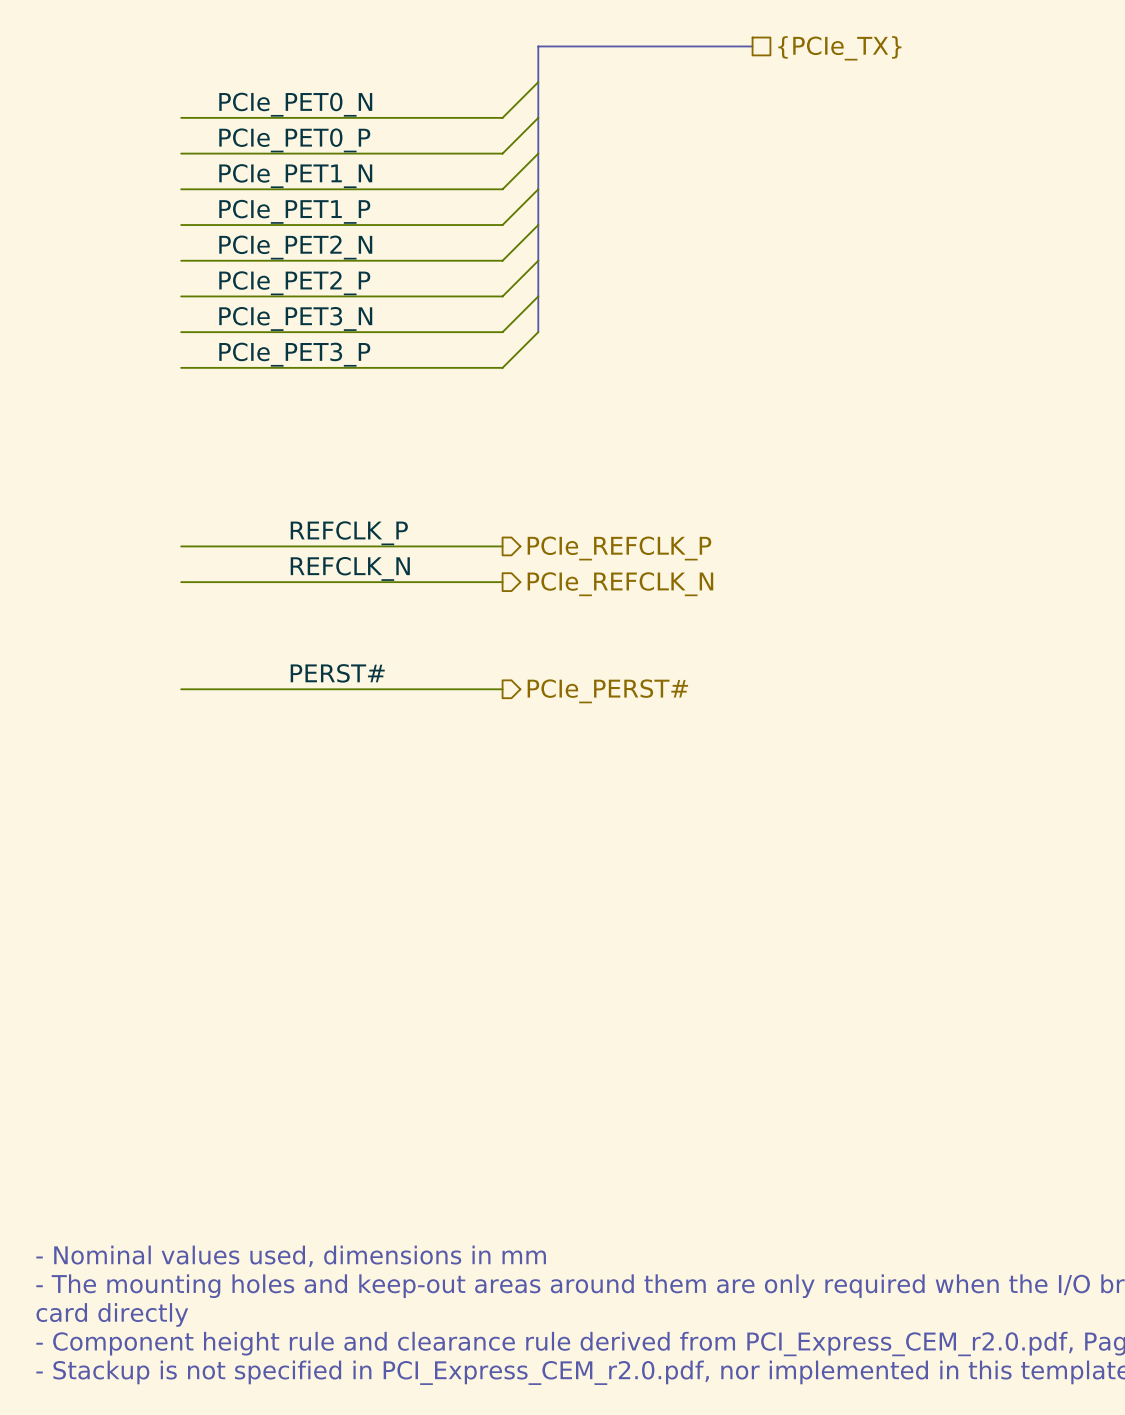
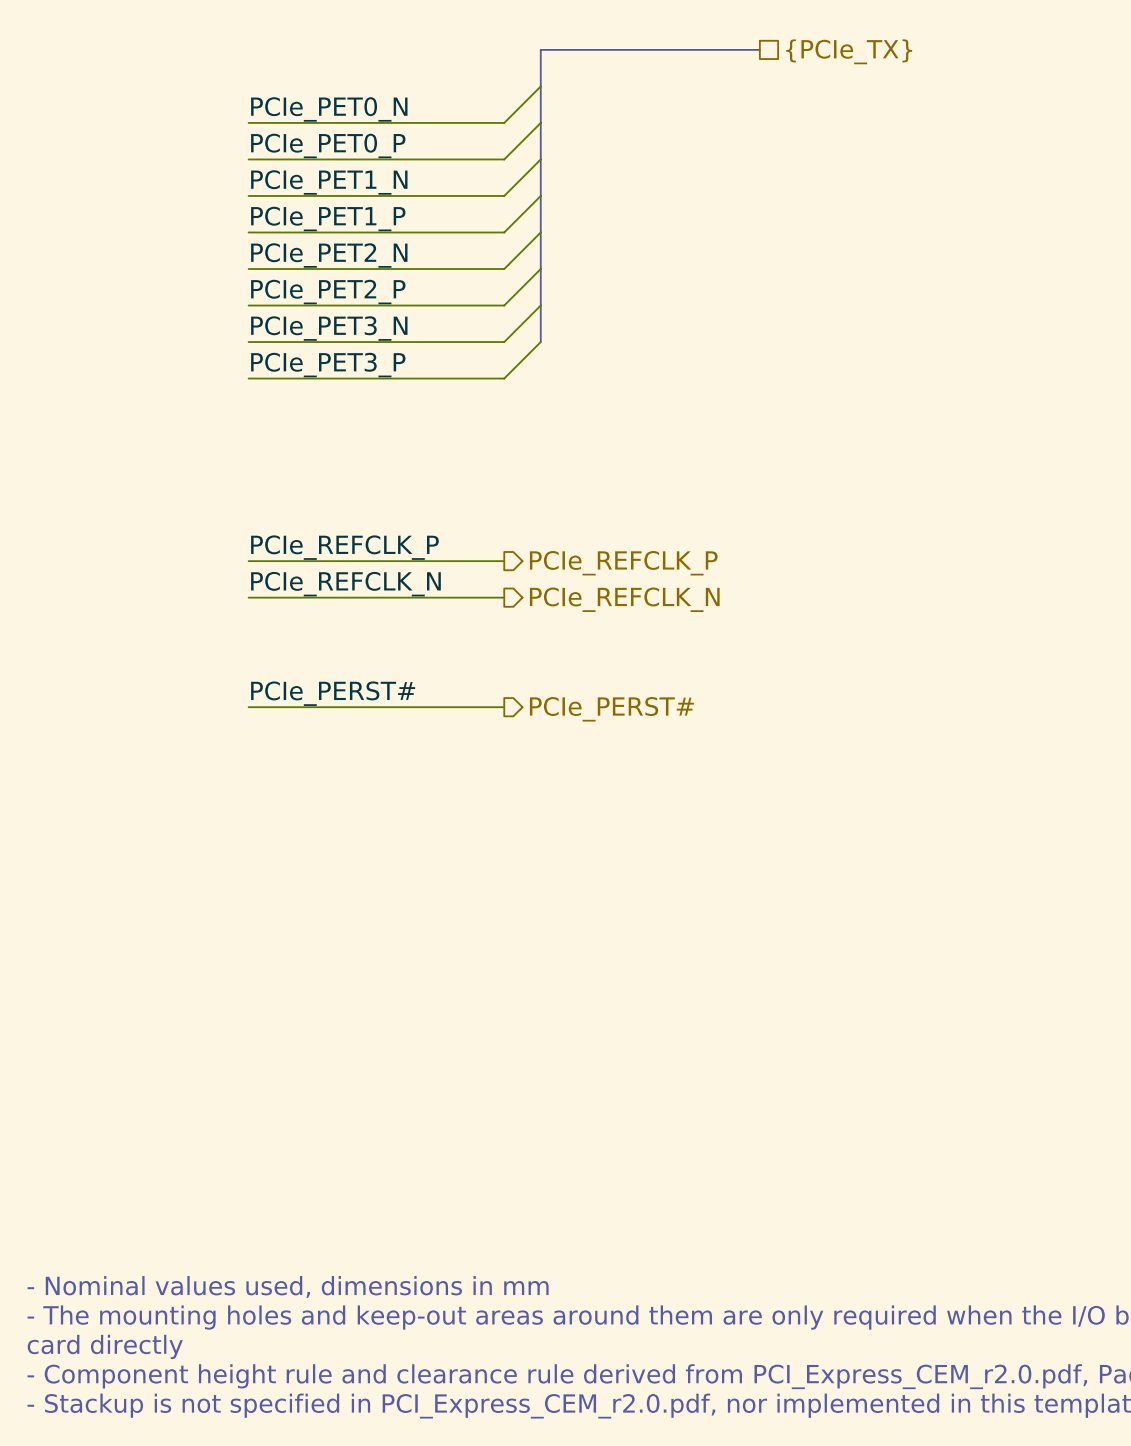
label position: PCIe_PET0_N (295, 104) -> PCIe_PET0_N (329, 109)
wire: (181, 117) (252, 117) -> none
label position: PCIe_PET0_P (294, 140) -> PCIe_PET0_P (328, 145)
wire: (181, 153) (252, 153) -> none
label position: PCIe_PET1_N (295, 176) -> PCIe_PET1_N (329, 182)
wire: (181, 189) (252, 189) -> none
label position: PCIe_PET1_P (294, 211) -> PCIe_PET1_P (328, 218)
wire: (181, 225) (252, 225) -> none
label position: PCIe_PET2_N (295, 247) -> PCIe_PET2_N (329, 255)
wire: (181, 260) (252, 260) -> none
label position: PCIe_PET2_P (294, 283) -> PCIe_PET2_P (328, 292)
wire: (181, 296) (252, 296) -> none
label position: PCIe_PET3_N (295, 318) -> PCIe_PET3_N (329, 328)
wire: (181, 332) (252, 332) -> none
label position: PCIe_PET3_P (294, 354) -> PCIe_PET3_P (328, 365)
wire: (181, 367) (252, 367) -> none
label: none -> PCIe_REFCLK_P (344, 547)
label: REFCLK_P (349, 533) -> none
wire: (181, 546) (252, 546) -> none
label: none -> PCIe_REFCLK_N (345, 584)
label: REFCLK_N (350, 568) -> none
wire: (181, 582) (252, 582) -> none
label: PERST# (337, 673) -> PCIe_PERST# (333, 693)
wire: (181, 689) (252, 689) -> none

